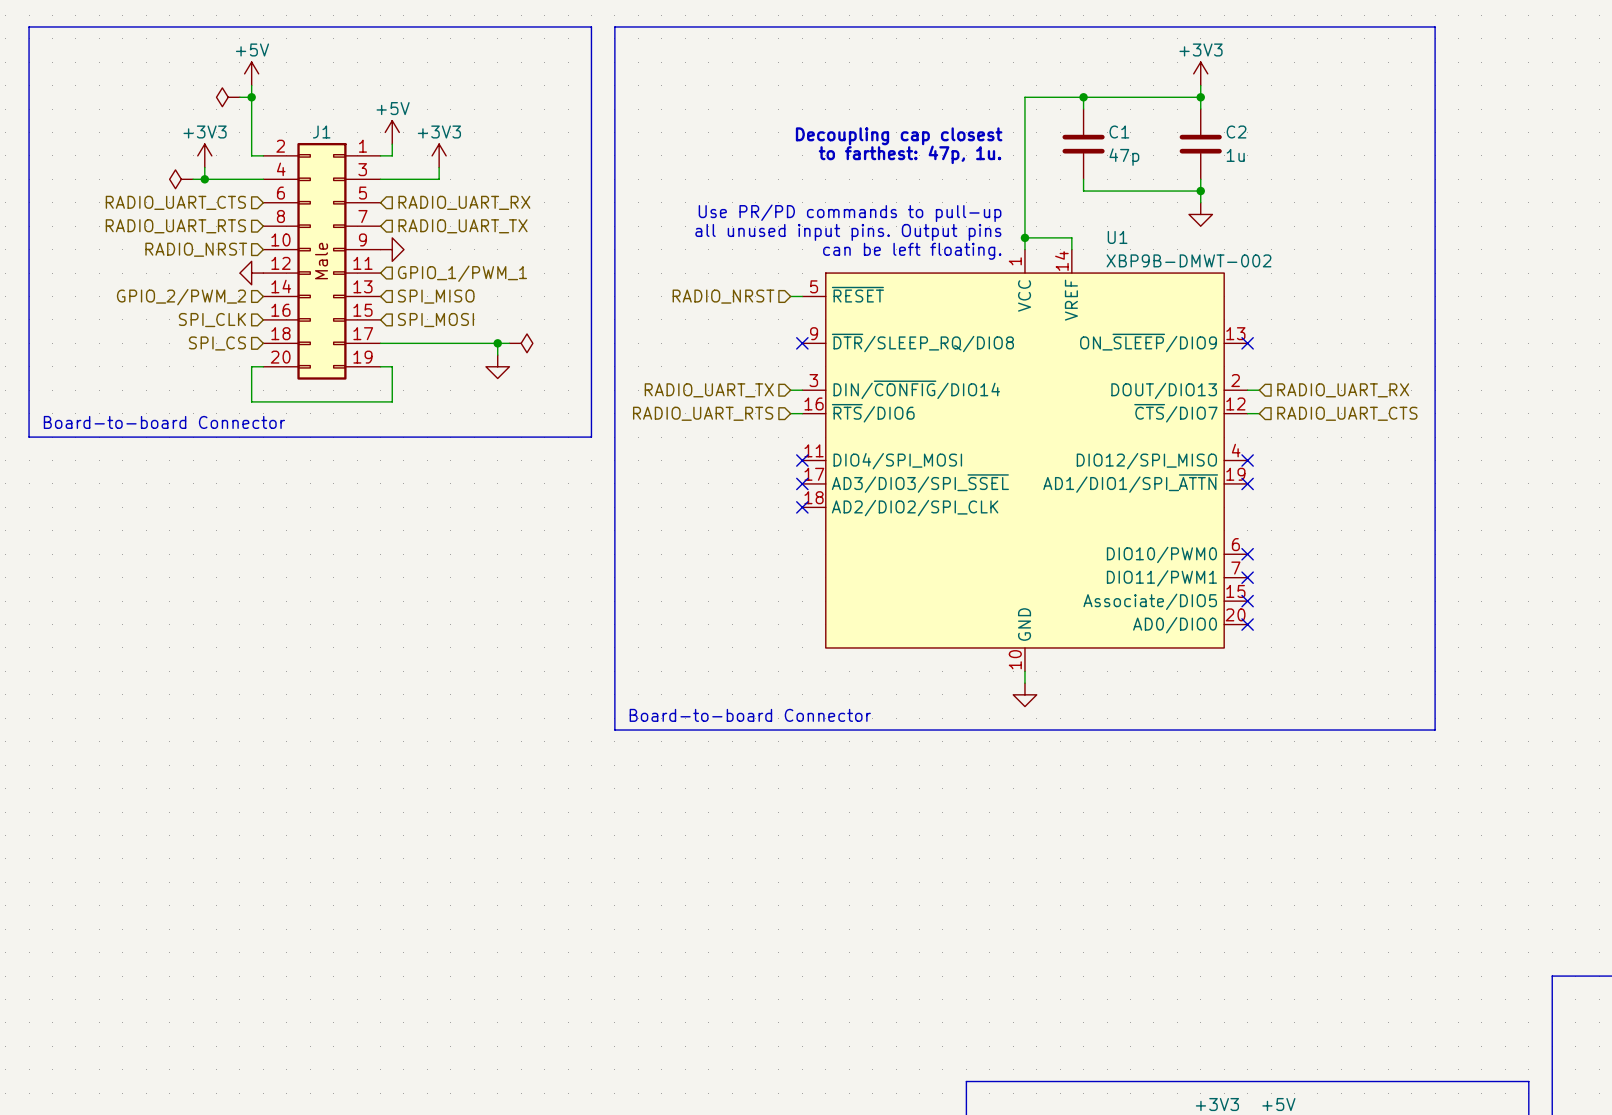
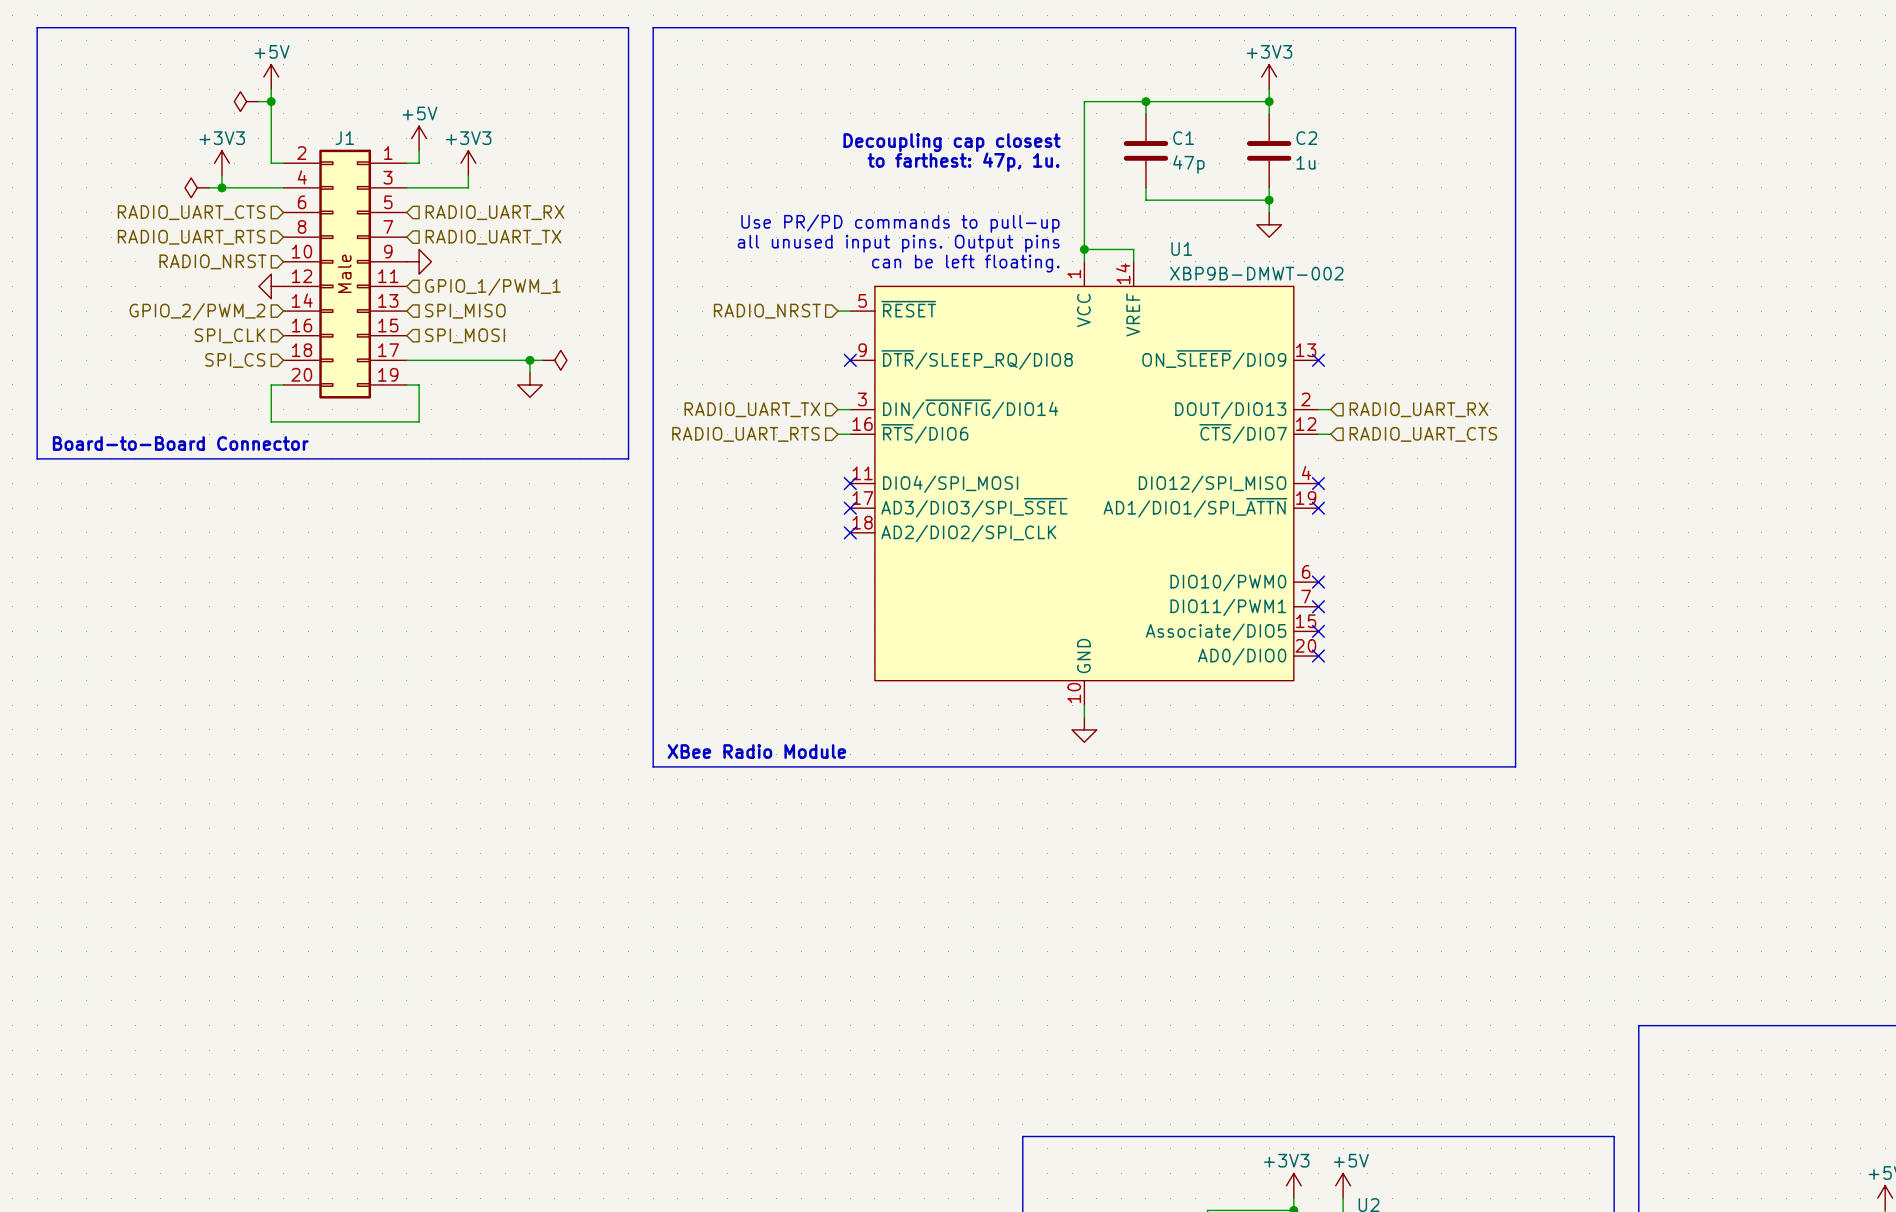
text: Board-to-board Connector (164, 422) -> Board-to-Board Connector (180, 443)
text: Board-to-board Connector (750, 715) -> XBee Radio Module (756, 751)

